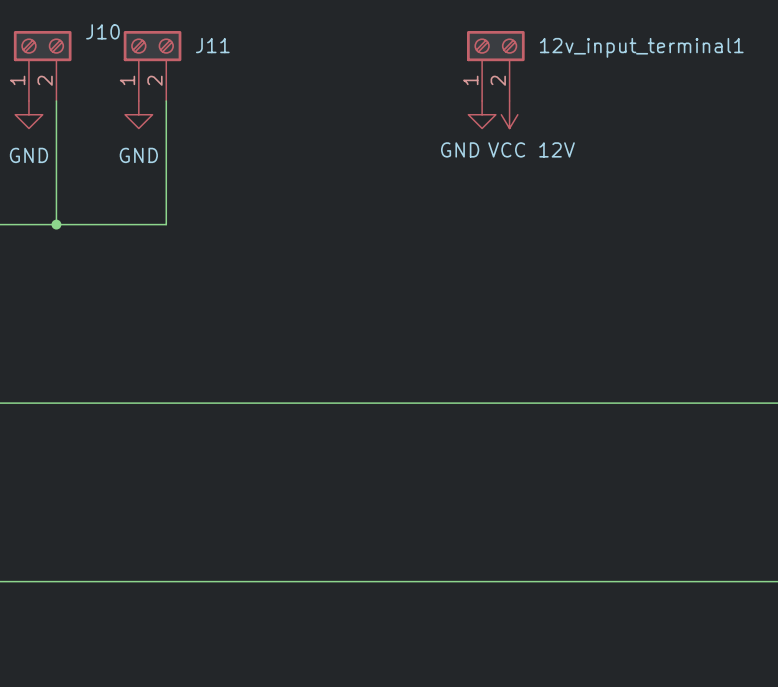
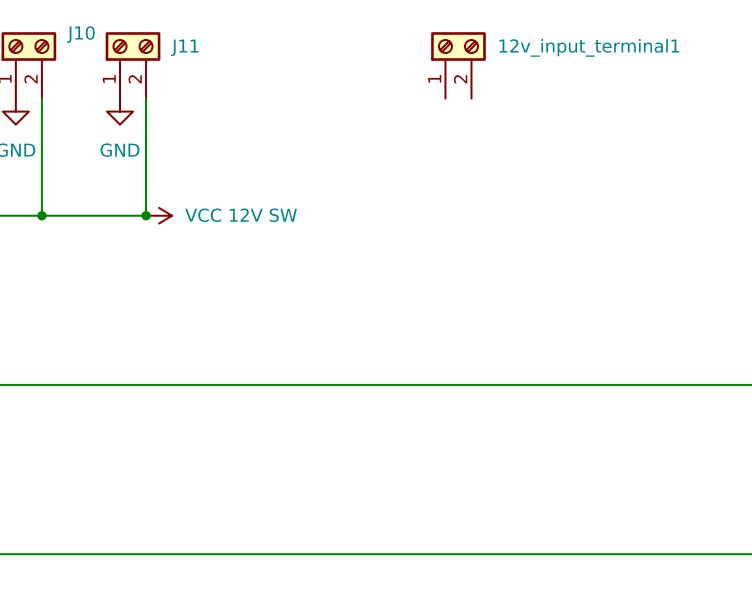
power symbol: GND (482, 114) -> none
power symbol: VCC 12V (509, 114) -> none
junction: none -> (146, 215)
power symbol: none -> VCC 12V SW (159, 215)

